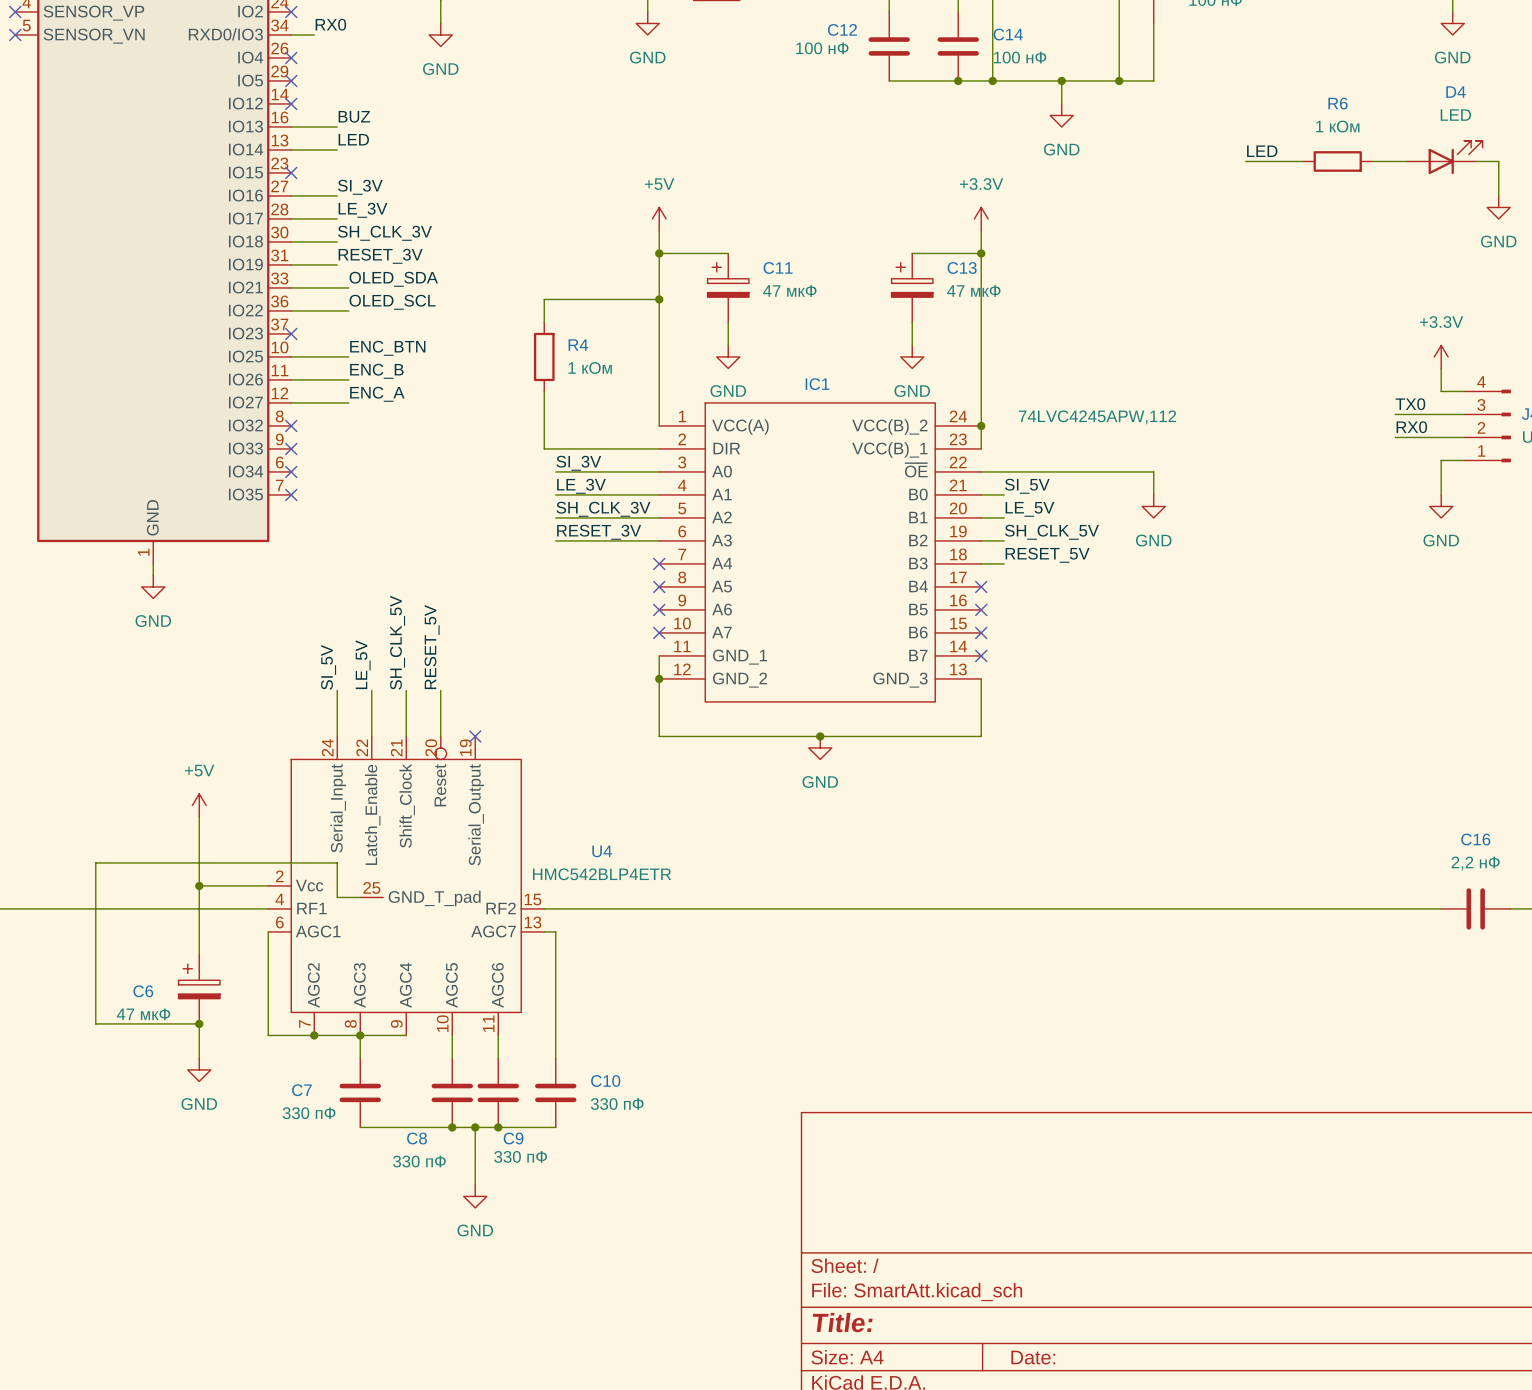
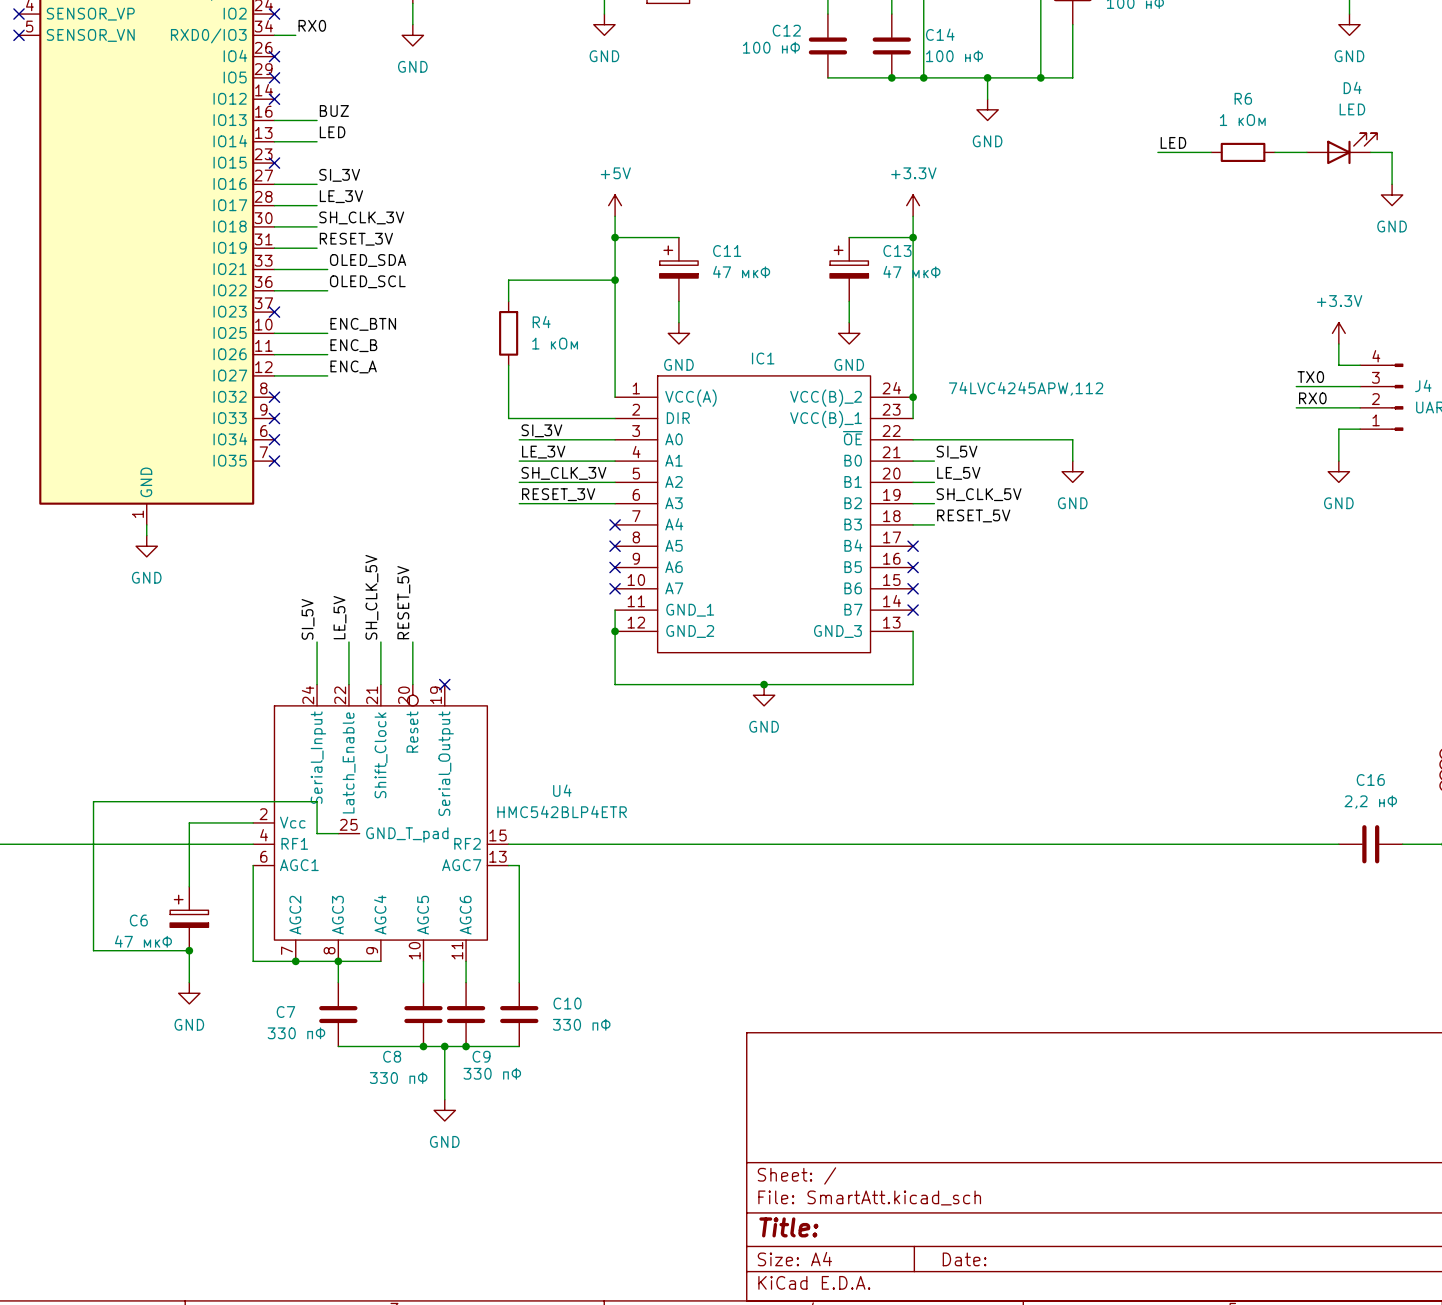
power symbol: +5V (199, 805) -> none
wire: (199, 816) (199, 885) -> none
junction: (199, 885) -> none

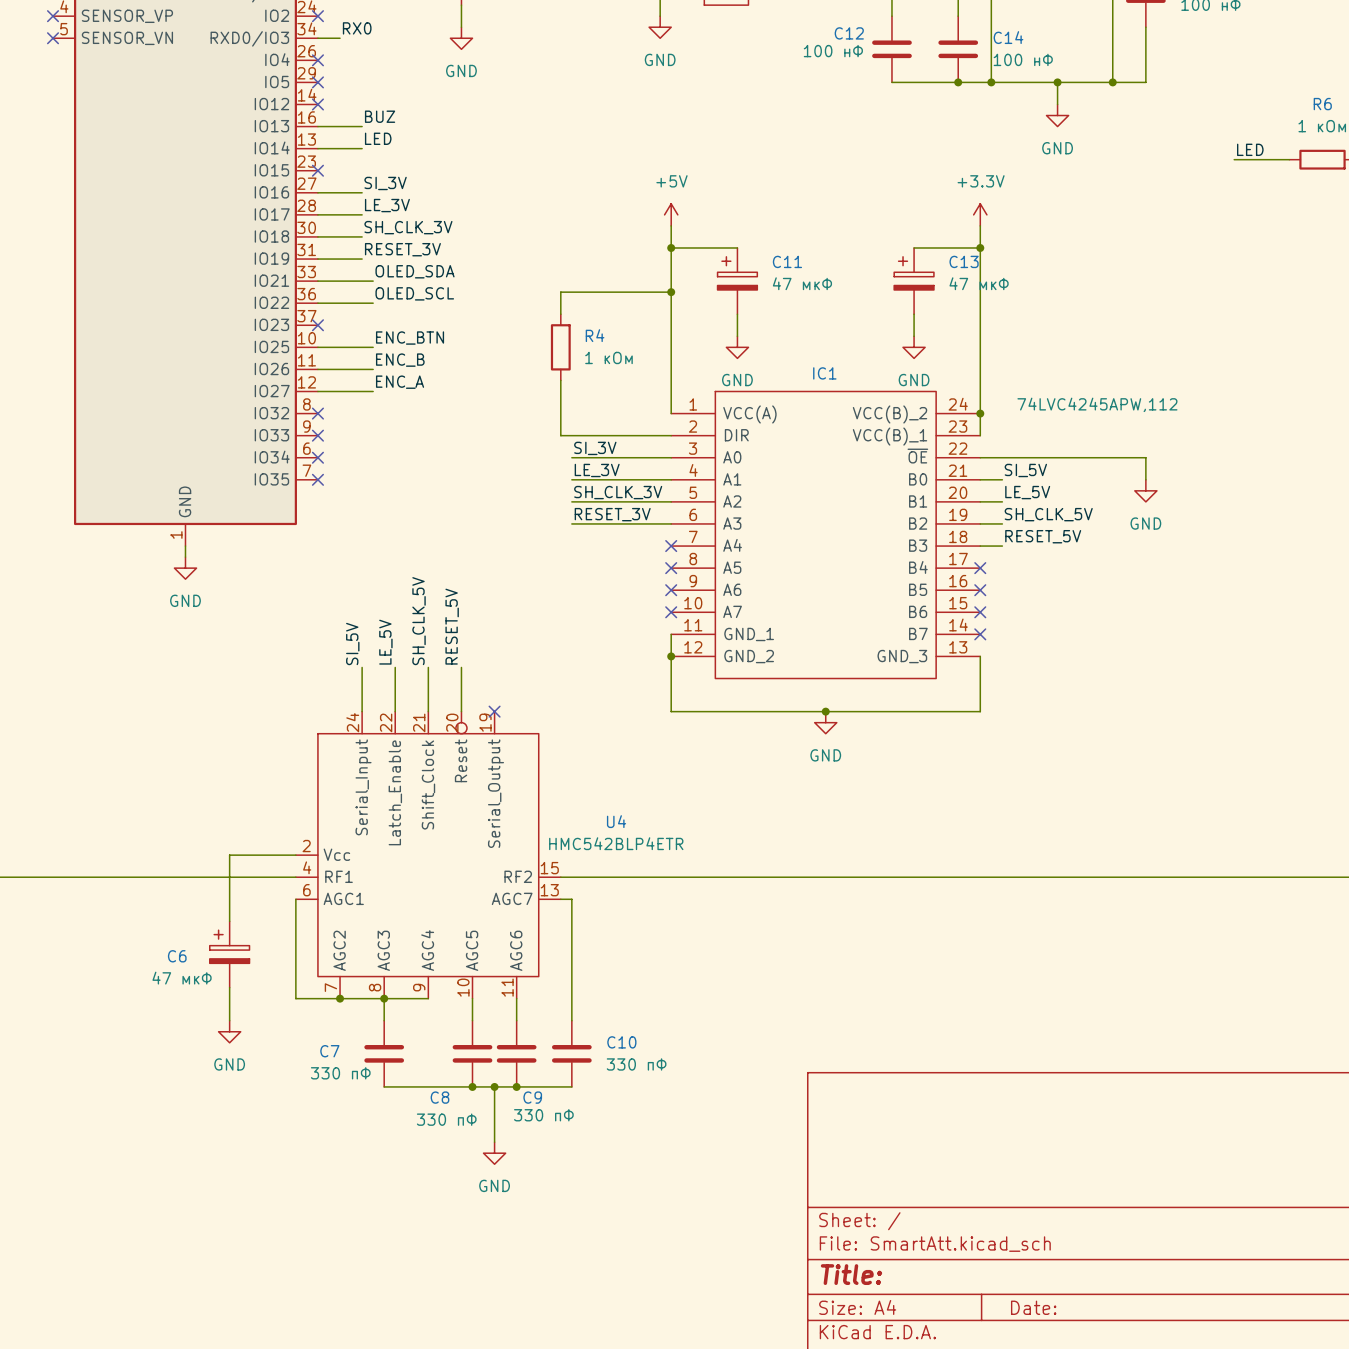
U4 symbol: [253, 684, 509, 962] -> [295, 711, 561, 999]
wire: (338, 833) (317, 833) (317, 801) (93, 801) (93, 950) (189, 950) -> none
junction: (189, 950) -> none

